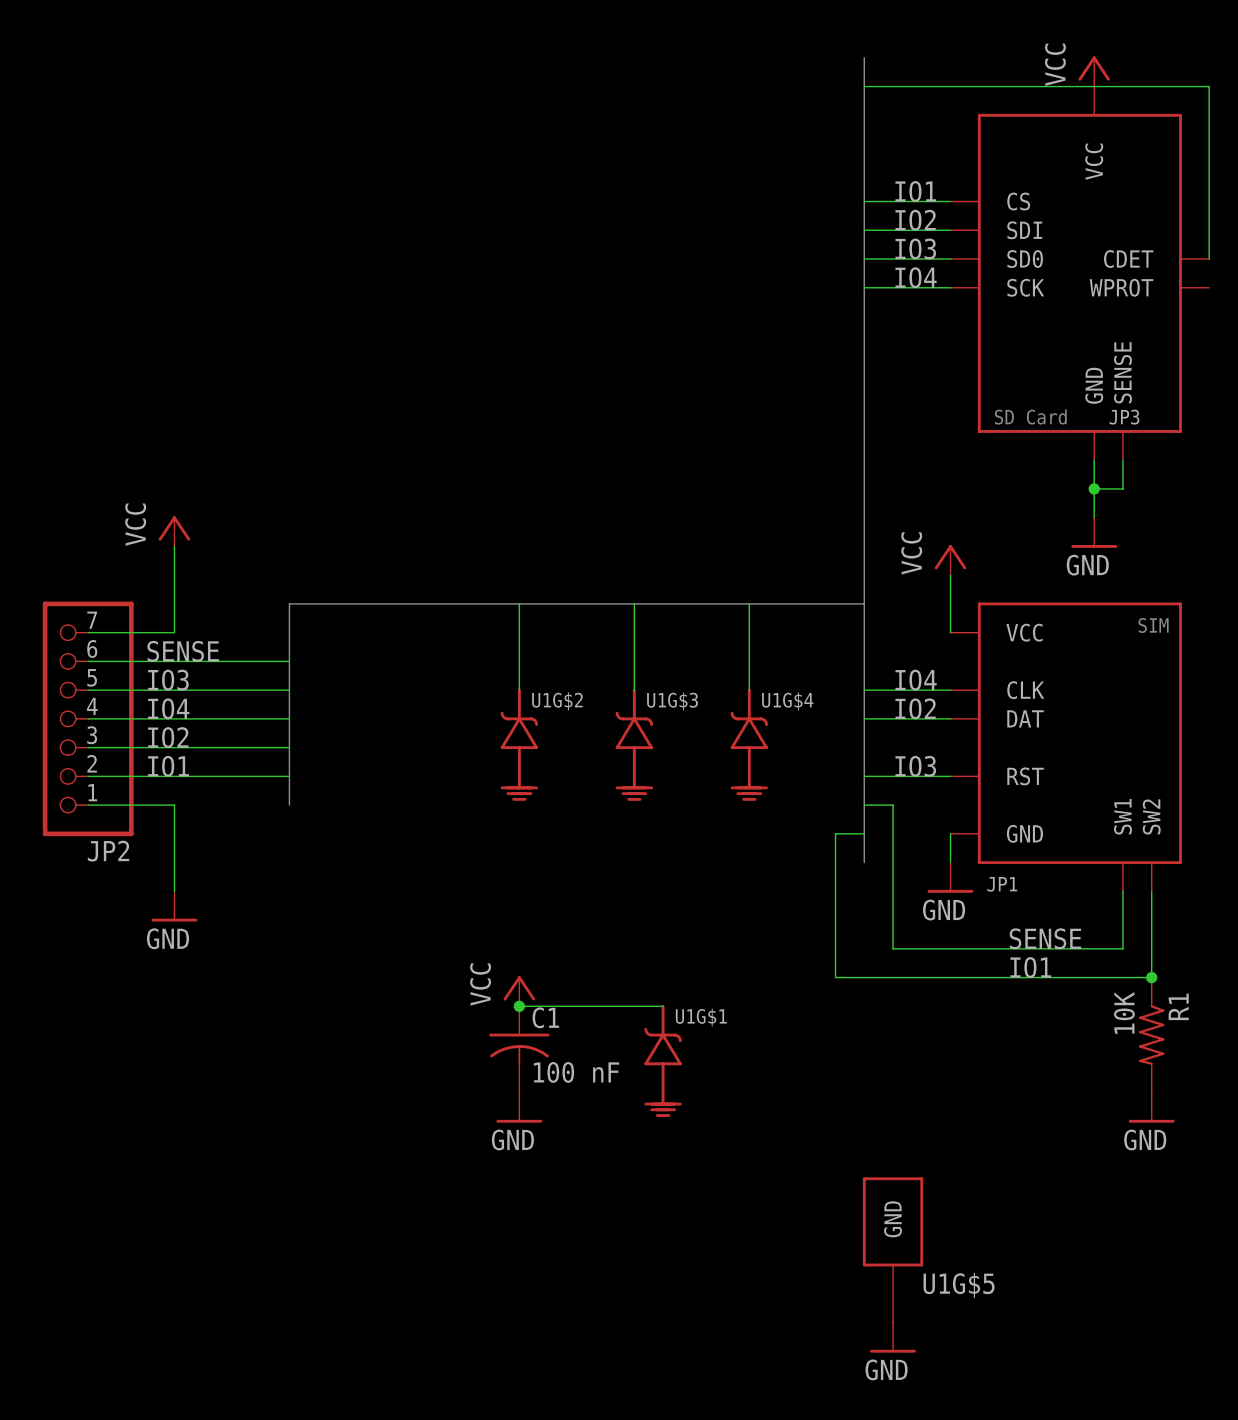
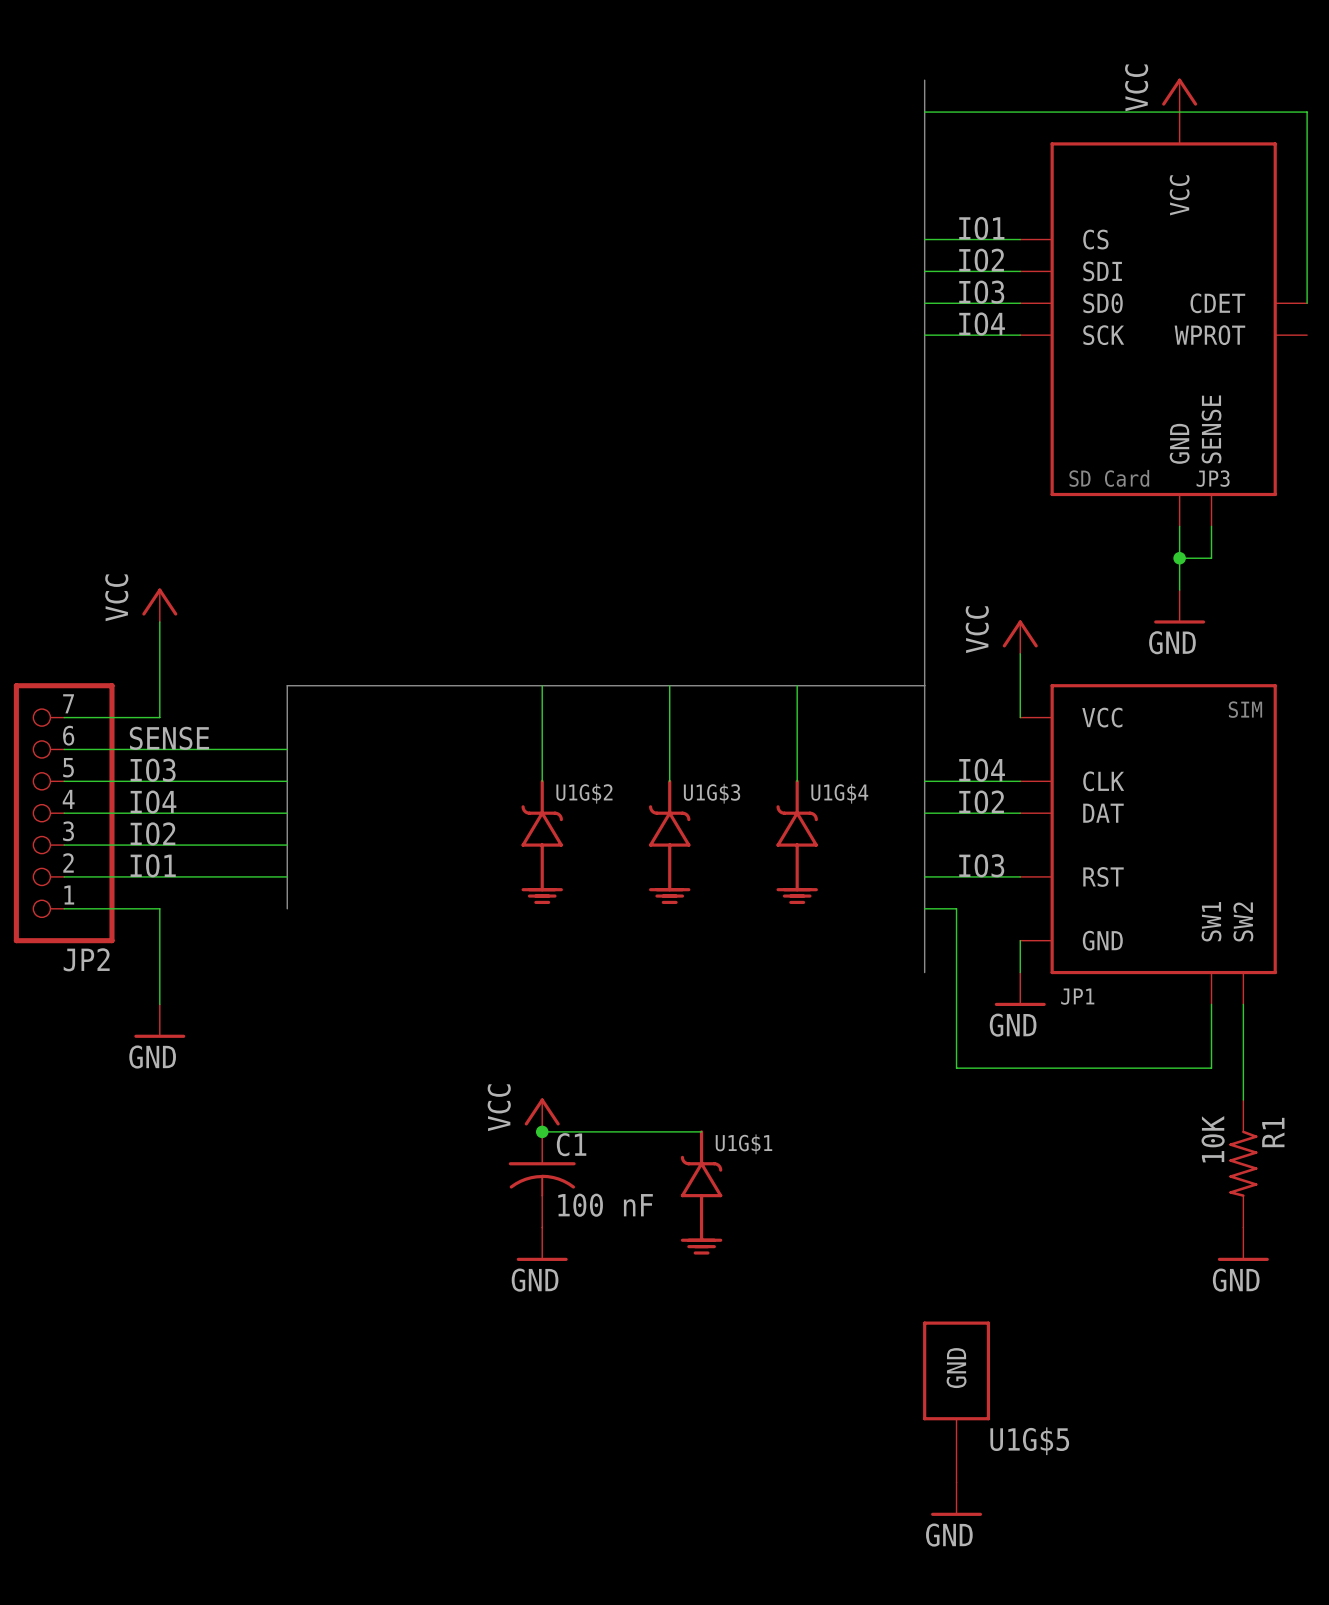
wire: (864, 833) (835, 833) (835, 977) (1151, 977) -> none
label: SENSE (1045, 938) -> none
label: IO1 (1030, 967) -> none
junction: (1151, 977) -> none

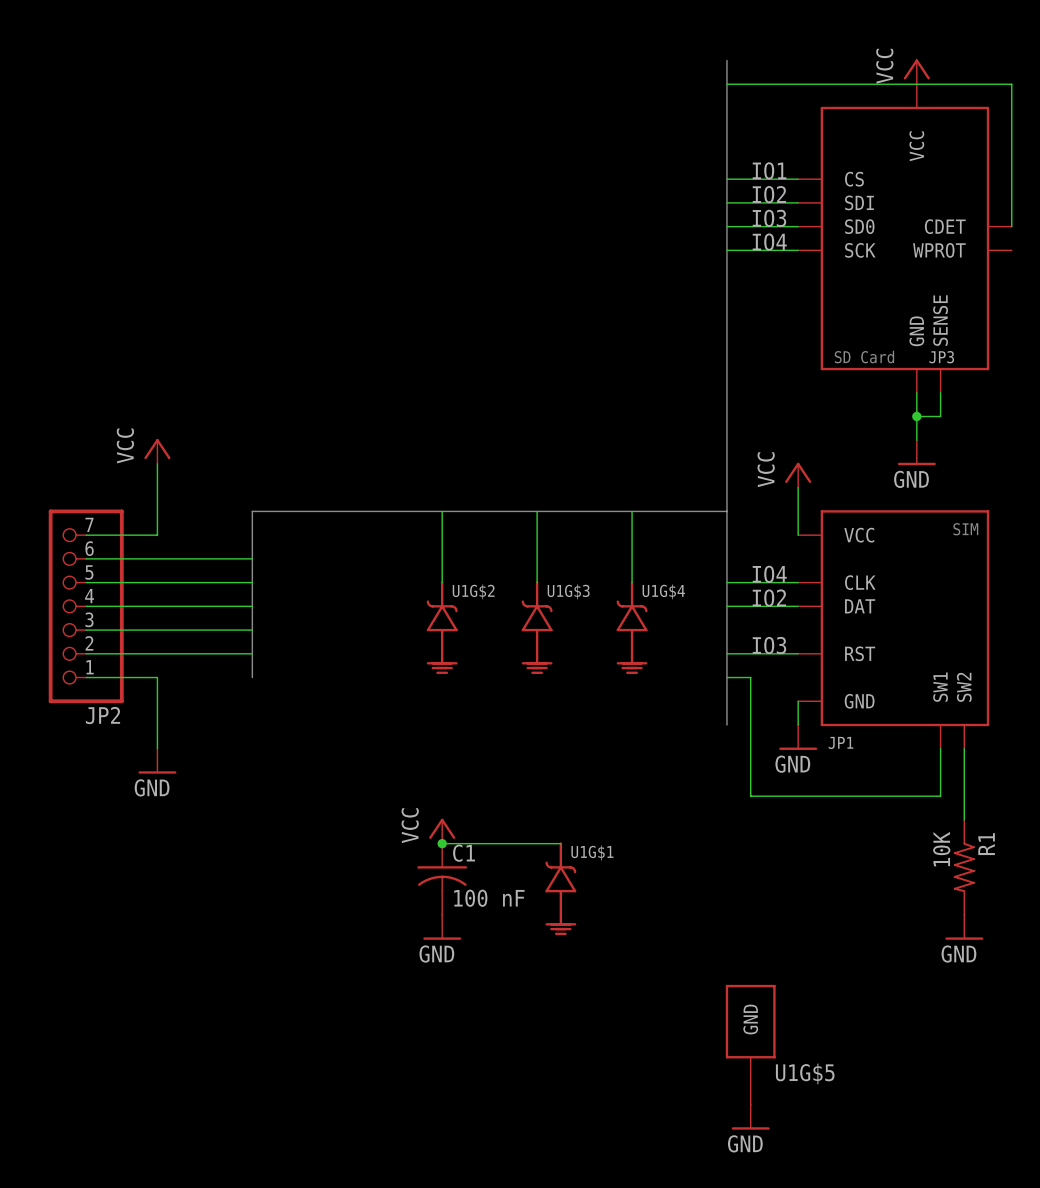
label: SENSE (169, 738) -> none
label: IO3 (153, 770) -> none
label: IO4 (153, 802) -> none
label: IO2 (152, 833) -> none
label: IO1 (153, 865) -> none

